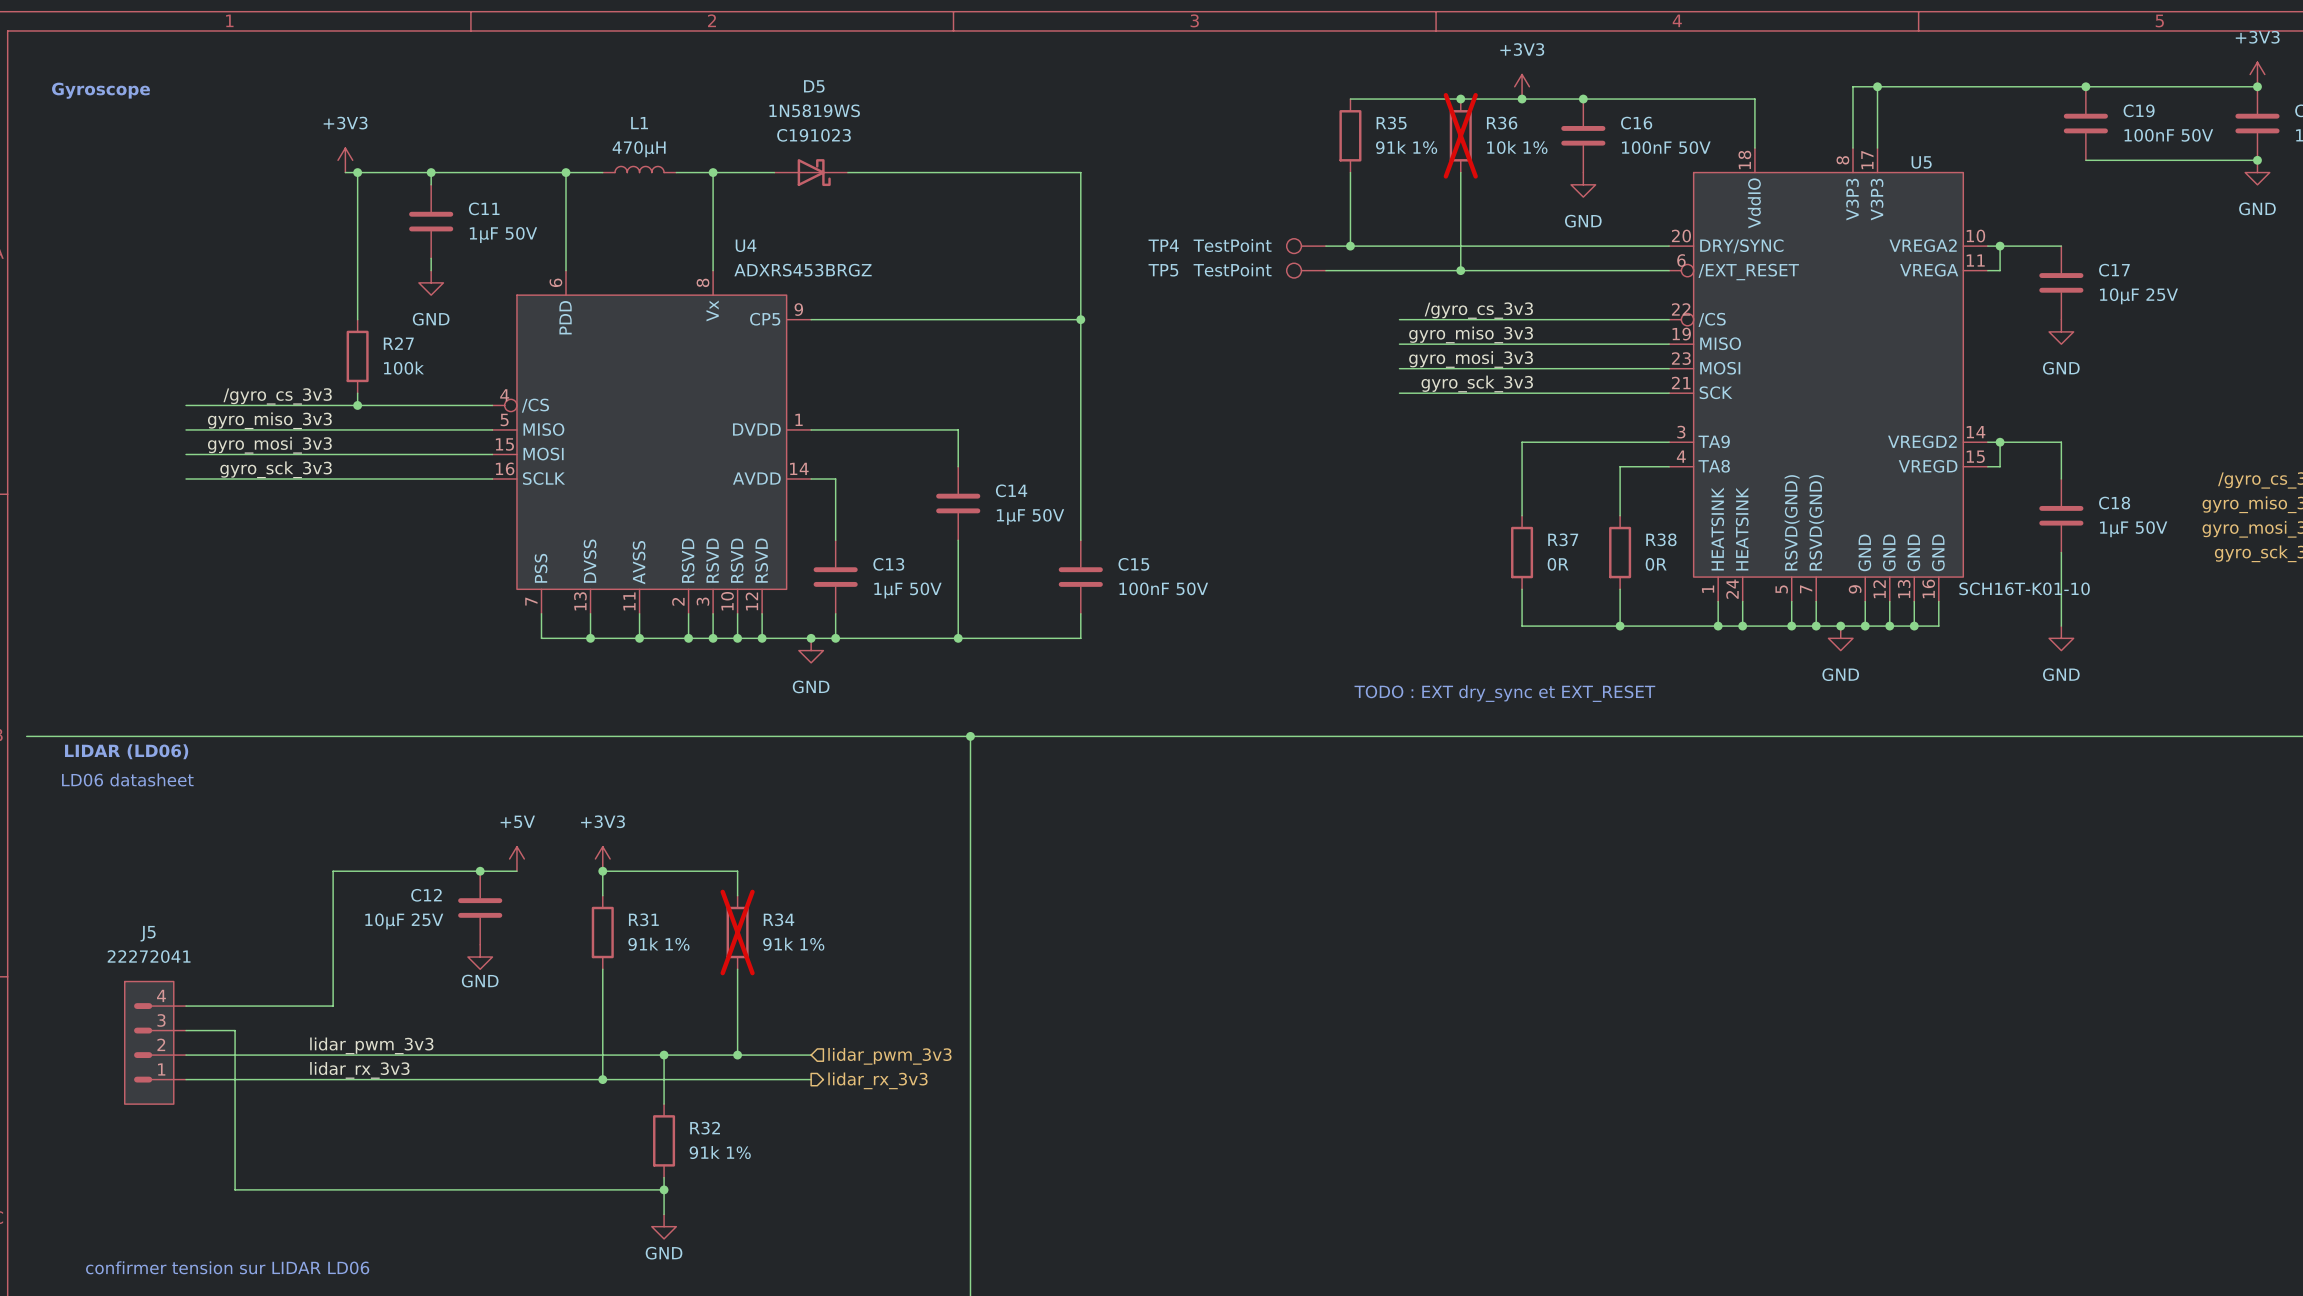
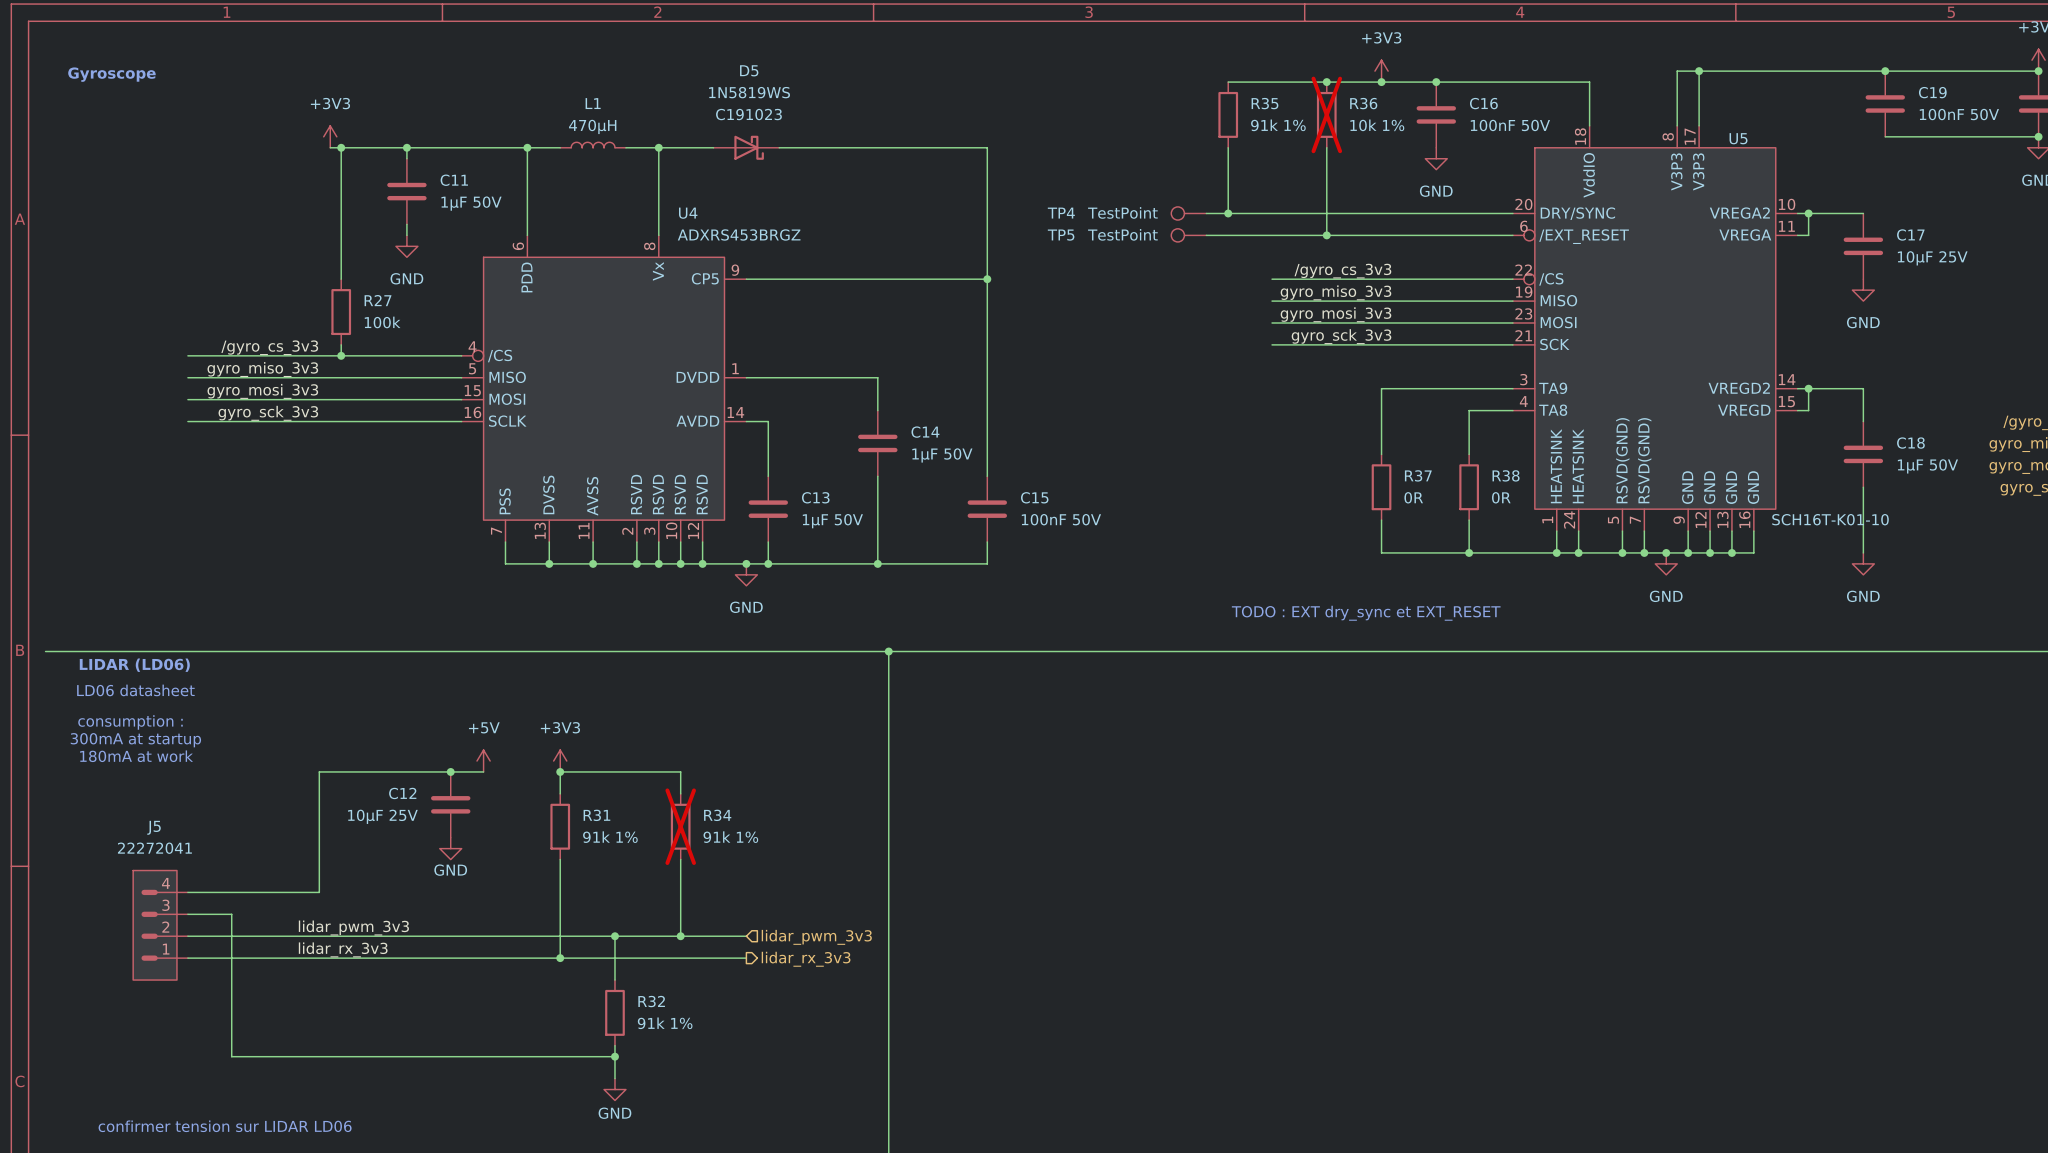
text: none -> consumption : (130, 722)
text: none -> 300mA at startup (135, 740)
text: none -> 180mA at work (136, 756)

